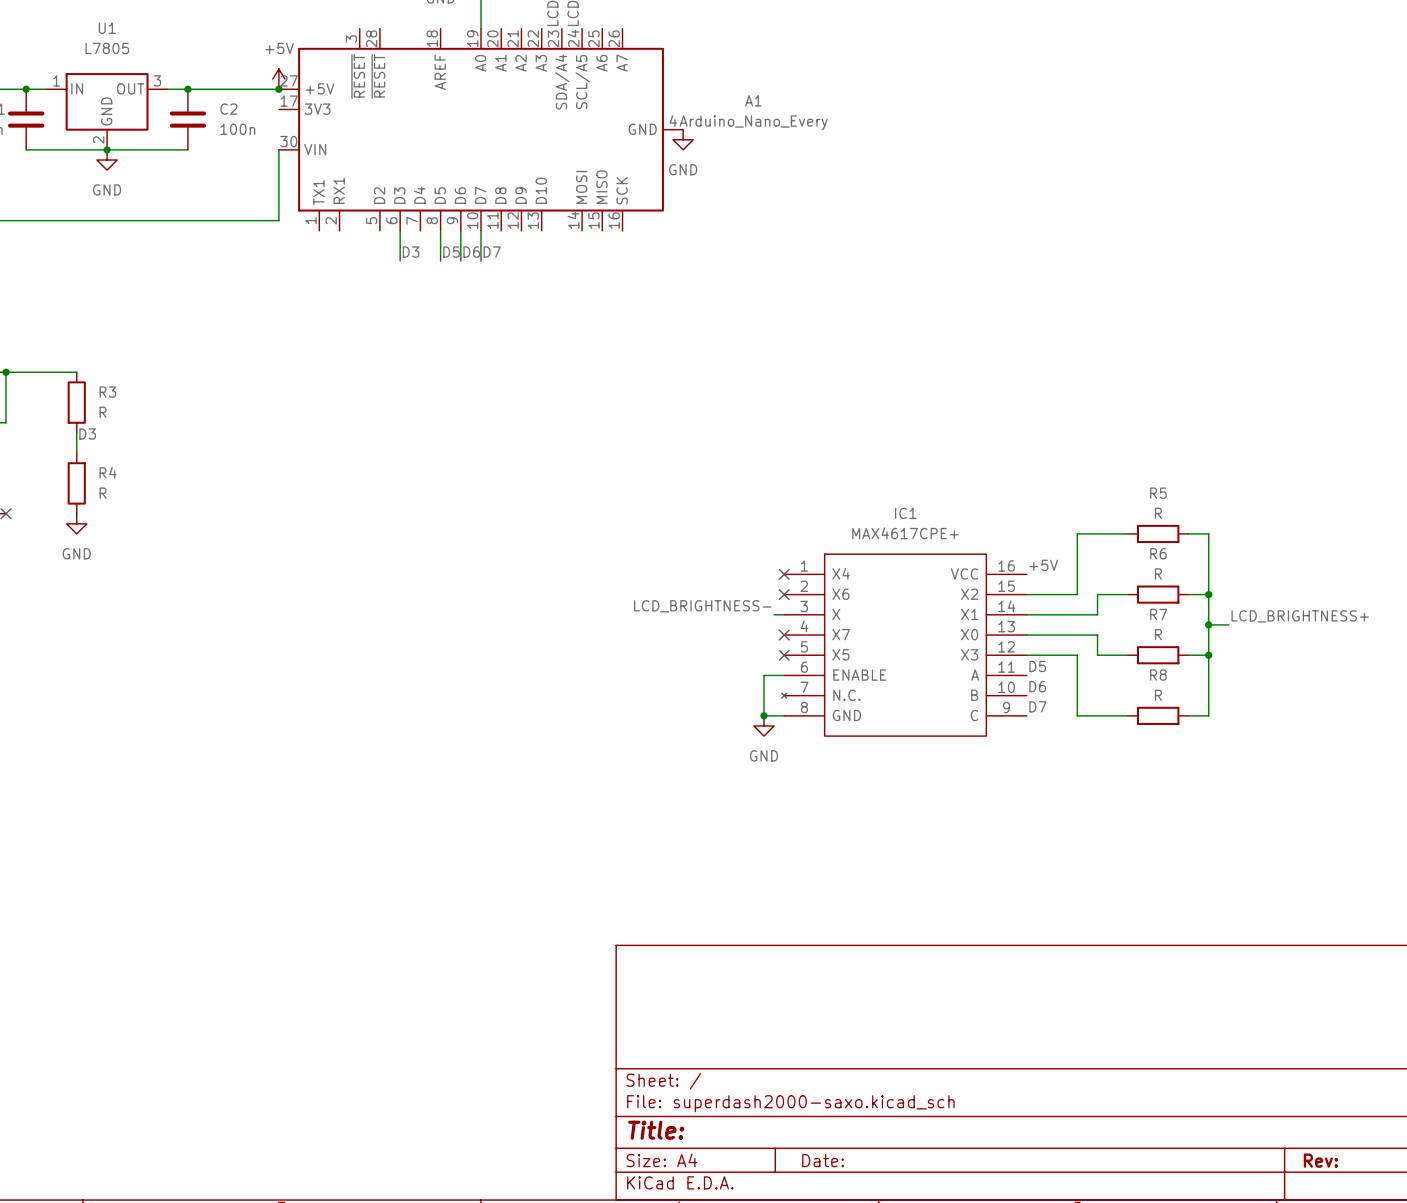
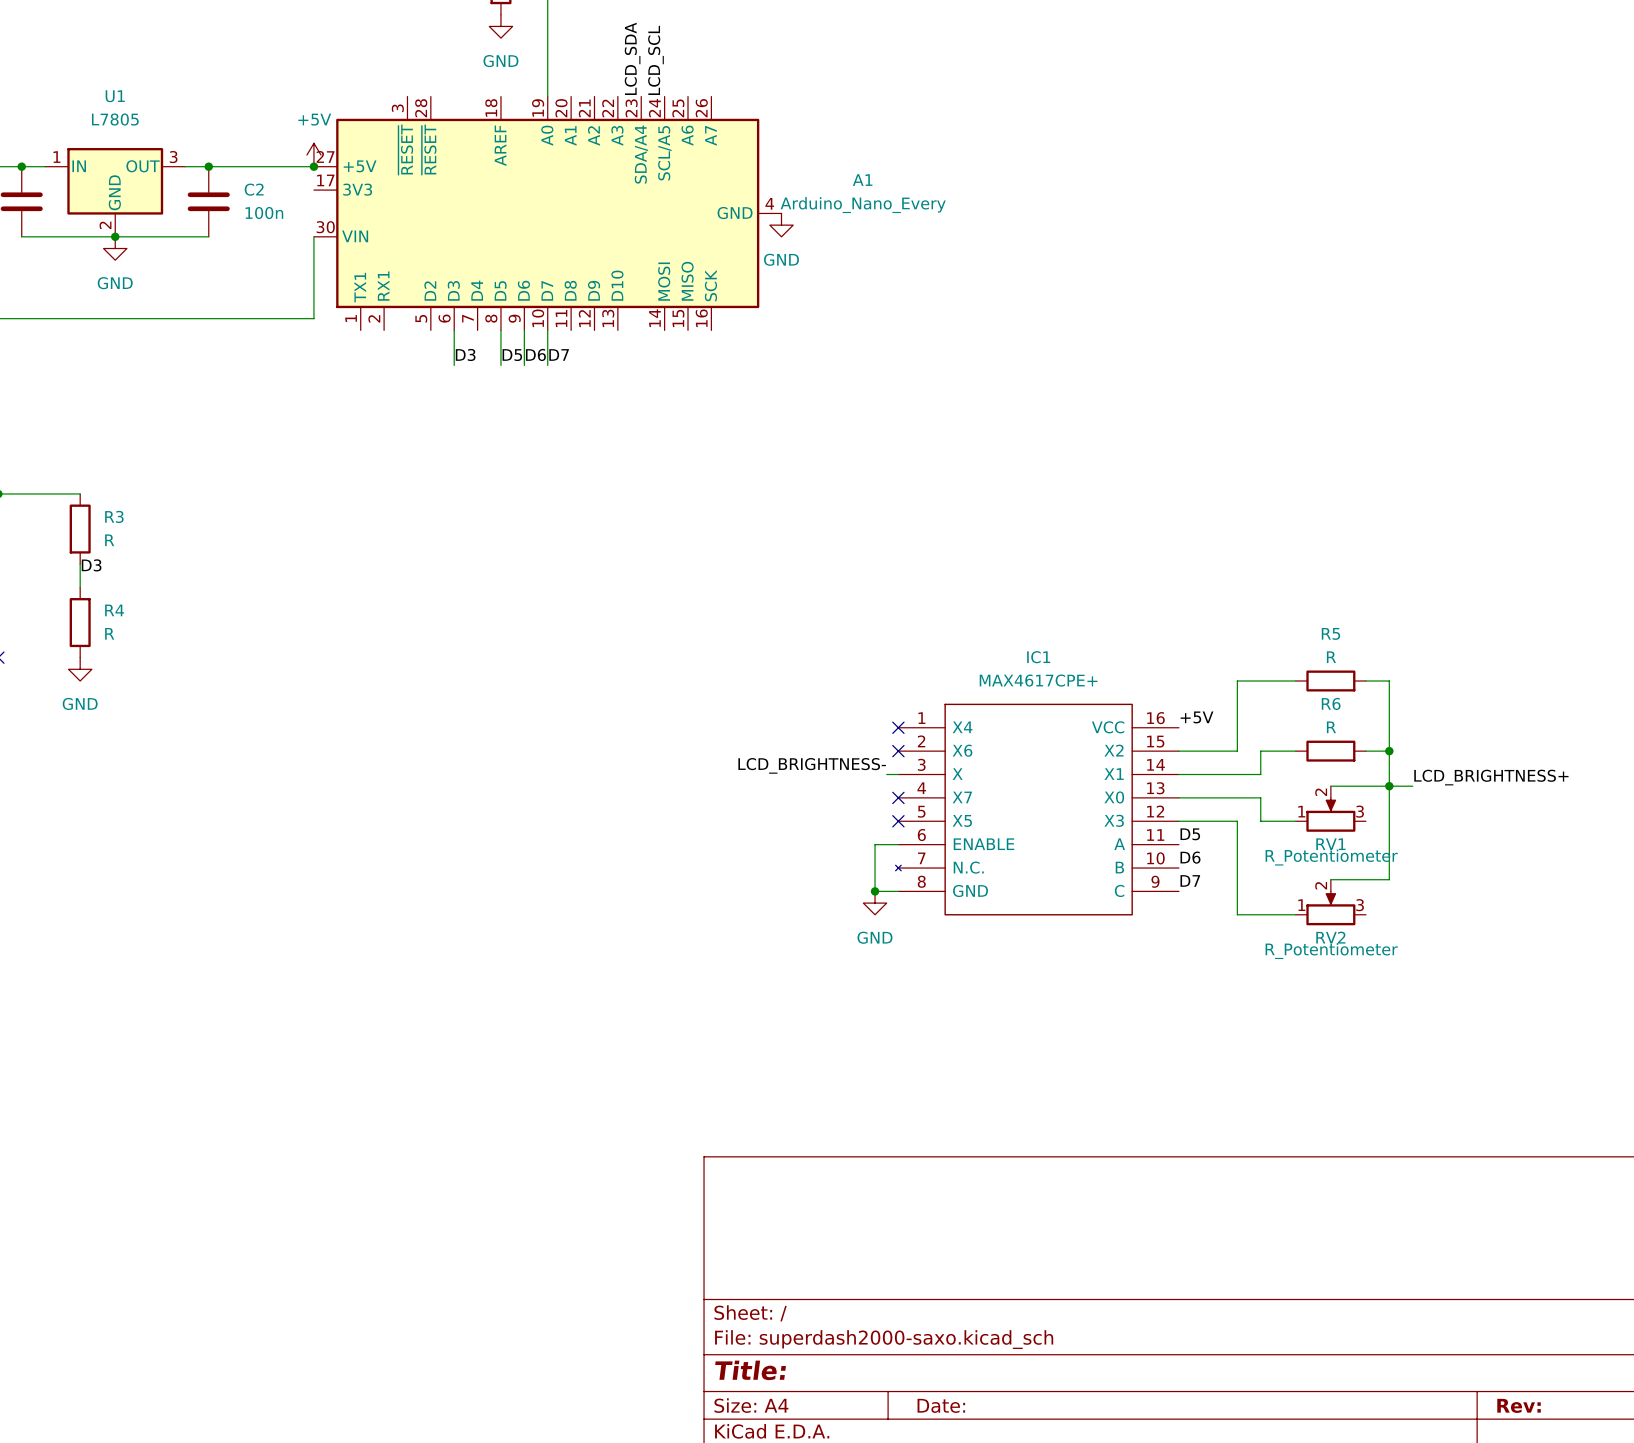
wire: none -> (1330, 786) (1389, 786)
RV1: none -> R_Potentiometer (1330, 808)
R7: R (1158, 655) -> none
wire: (1188, 655) (1208, 655) -> none
junction: (1208, 655) -> none
wire: (1208, 705) (1208, 715) (1188, 715) -> (1389, 879) (1330, 879)
wire: (1077, 715) (1127, 715) -> (1237, 891) (1237, 914) (1295, 914)
R8: R (1158, 715) -> none
RV2: none -> R_Potentiometer (1330, 902)

